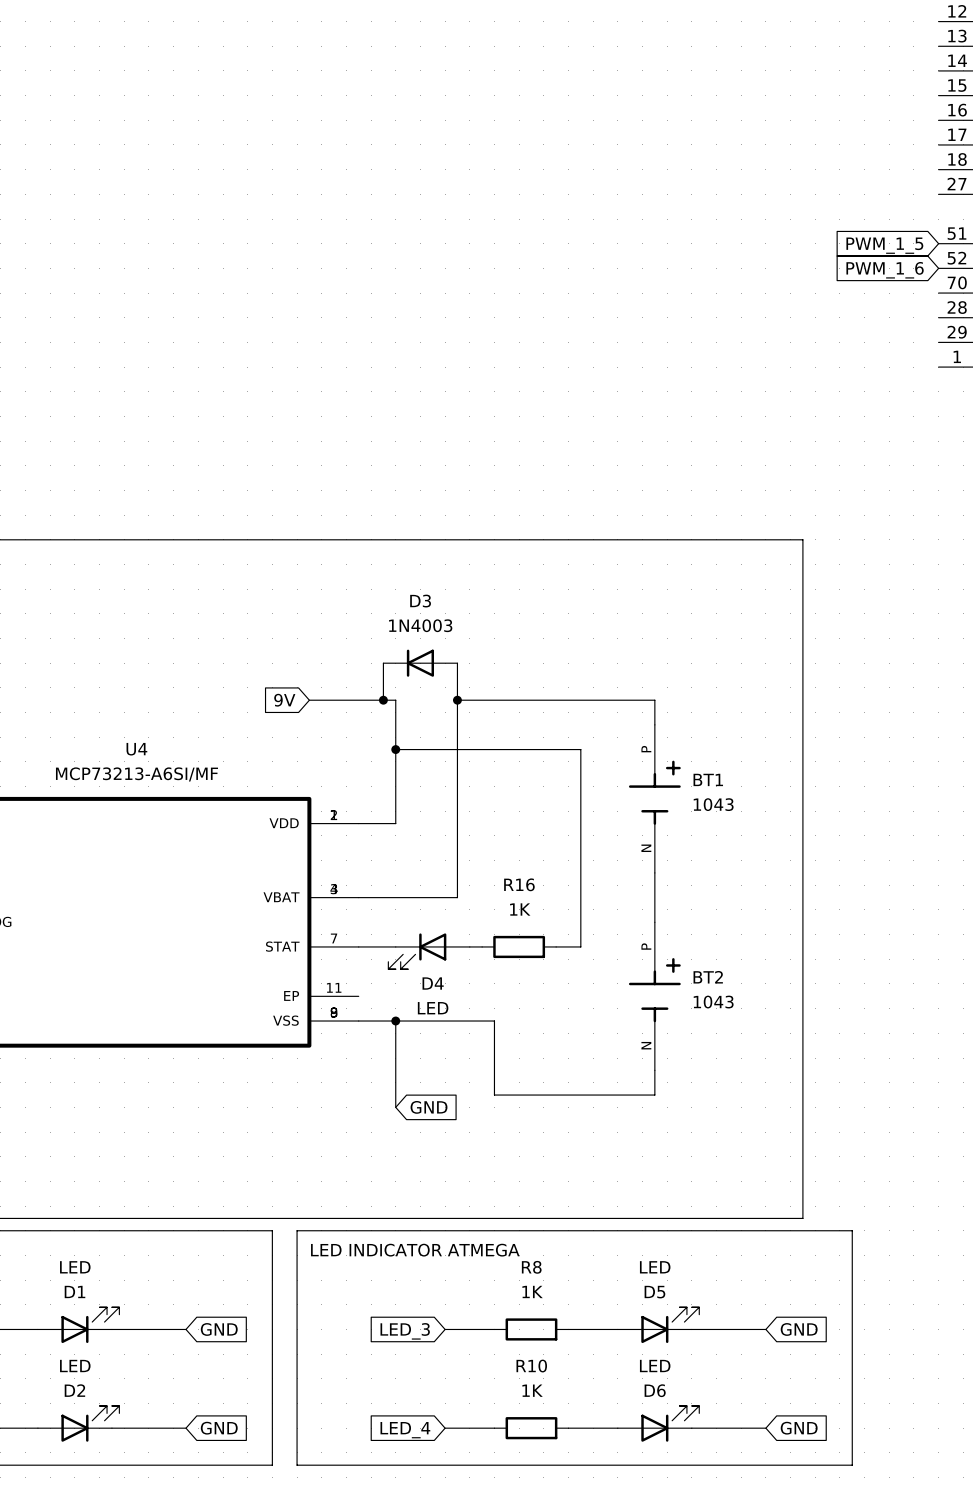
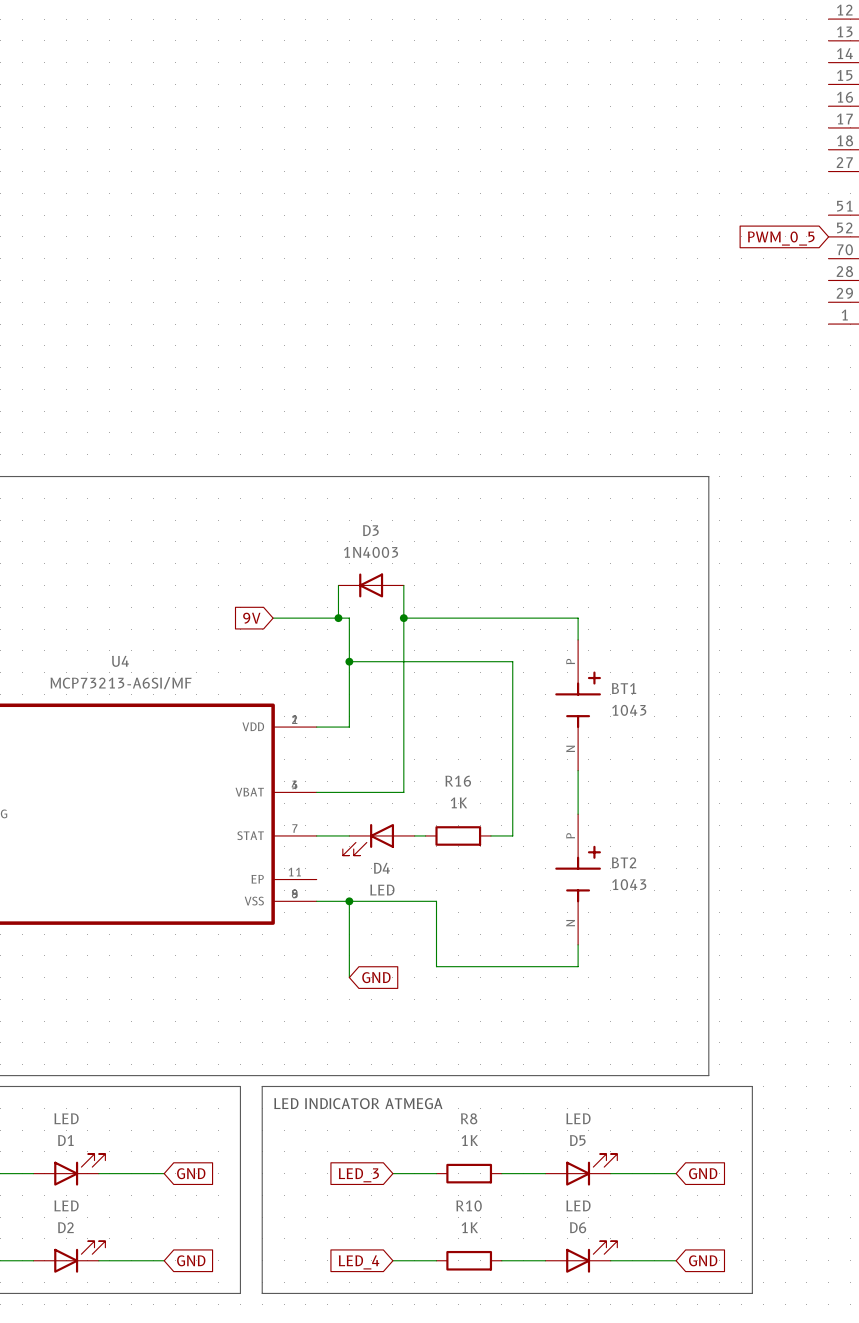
global label: PWM_1_5 (884, 245) -> none
global label: PWM_1_6 (885, 270) -> PWM_0_5 (781, 238)

